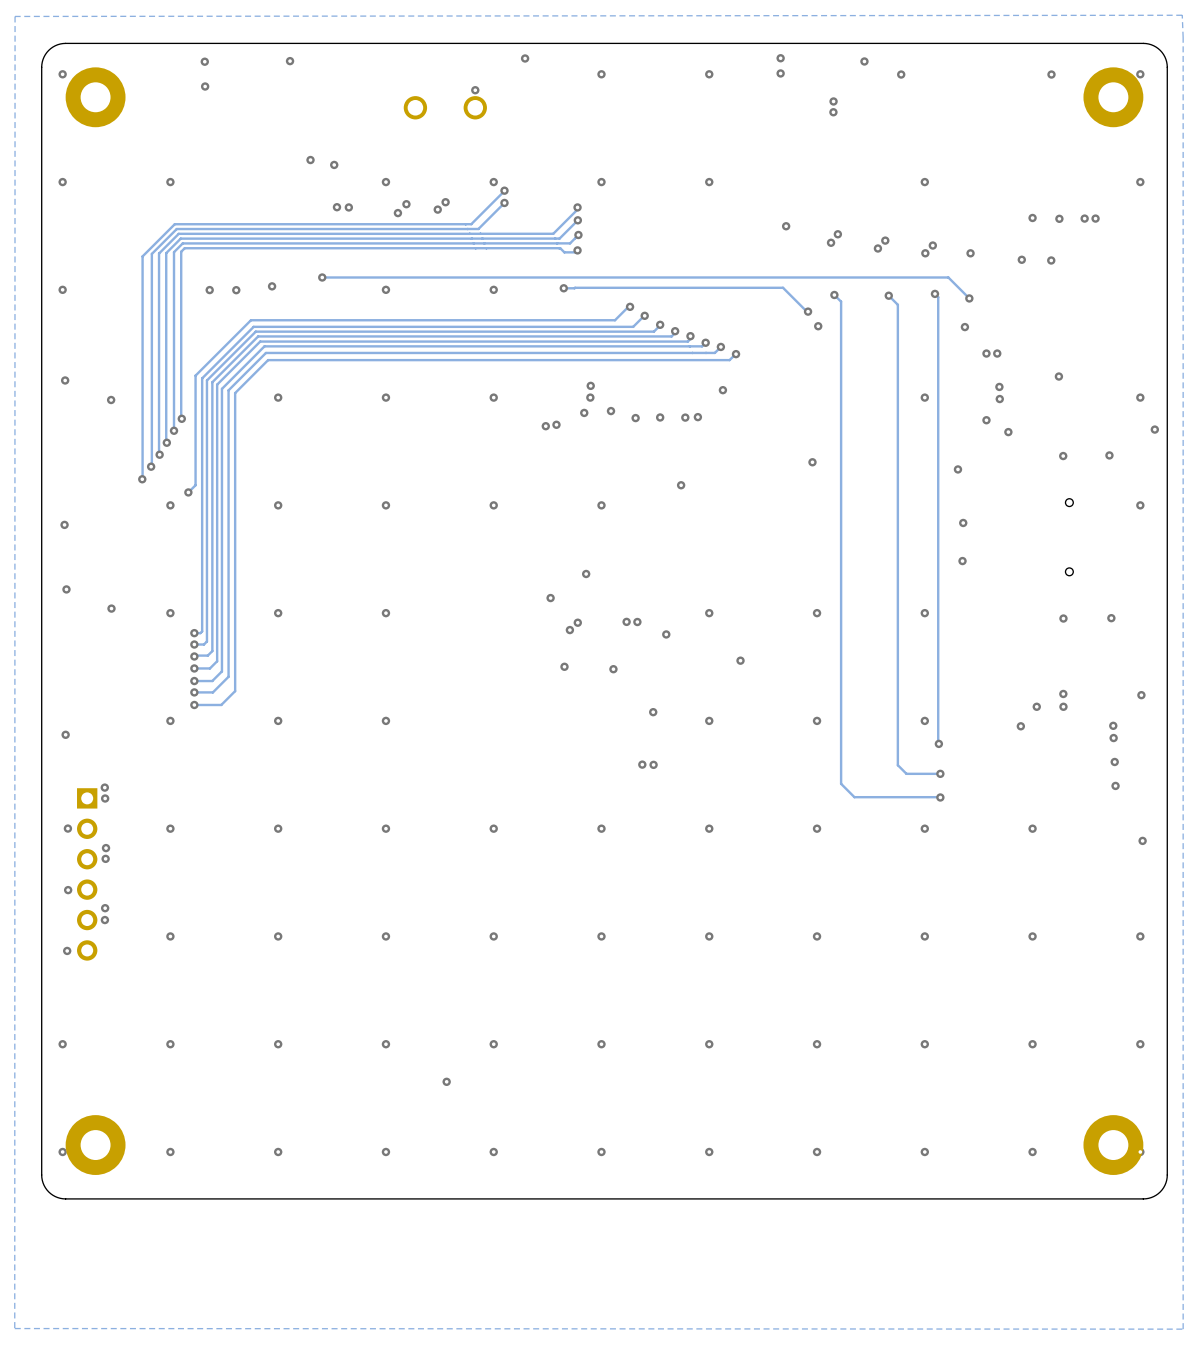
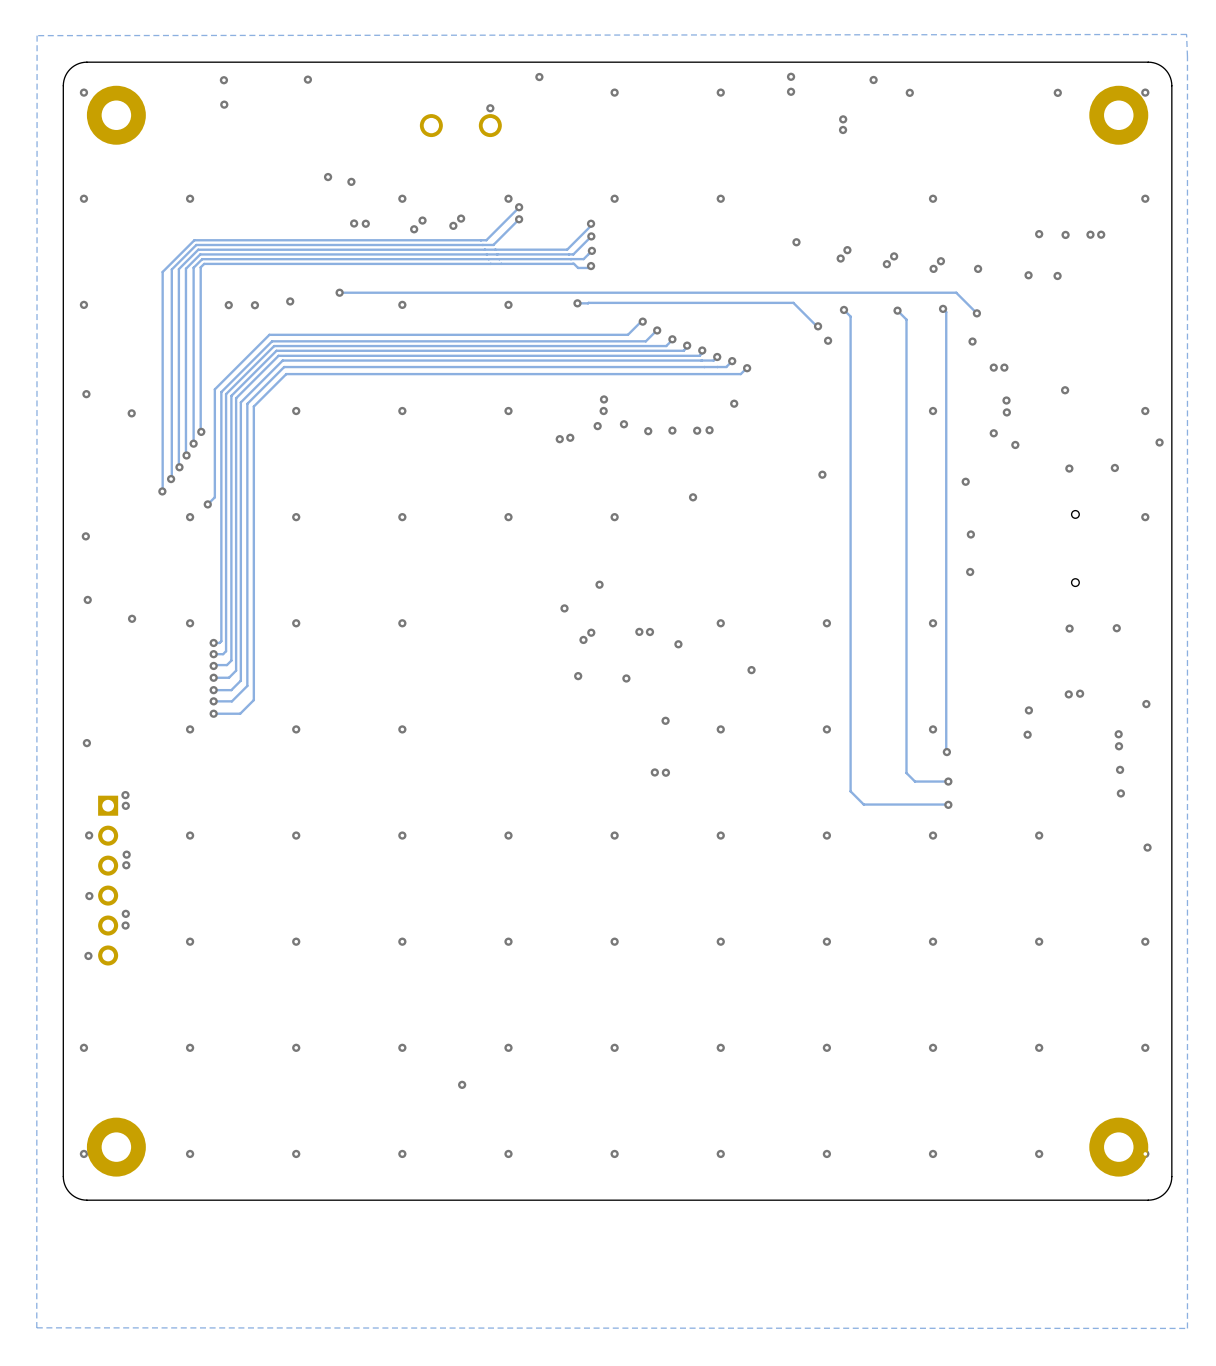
via: none -> (1080, 693)
via: none -> (1068, 694)
via: (1063, 693) -> none
via position: (1036, 706) -> (1028, 710)
via: (1063, 706) -> none

